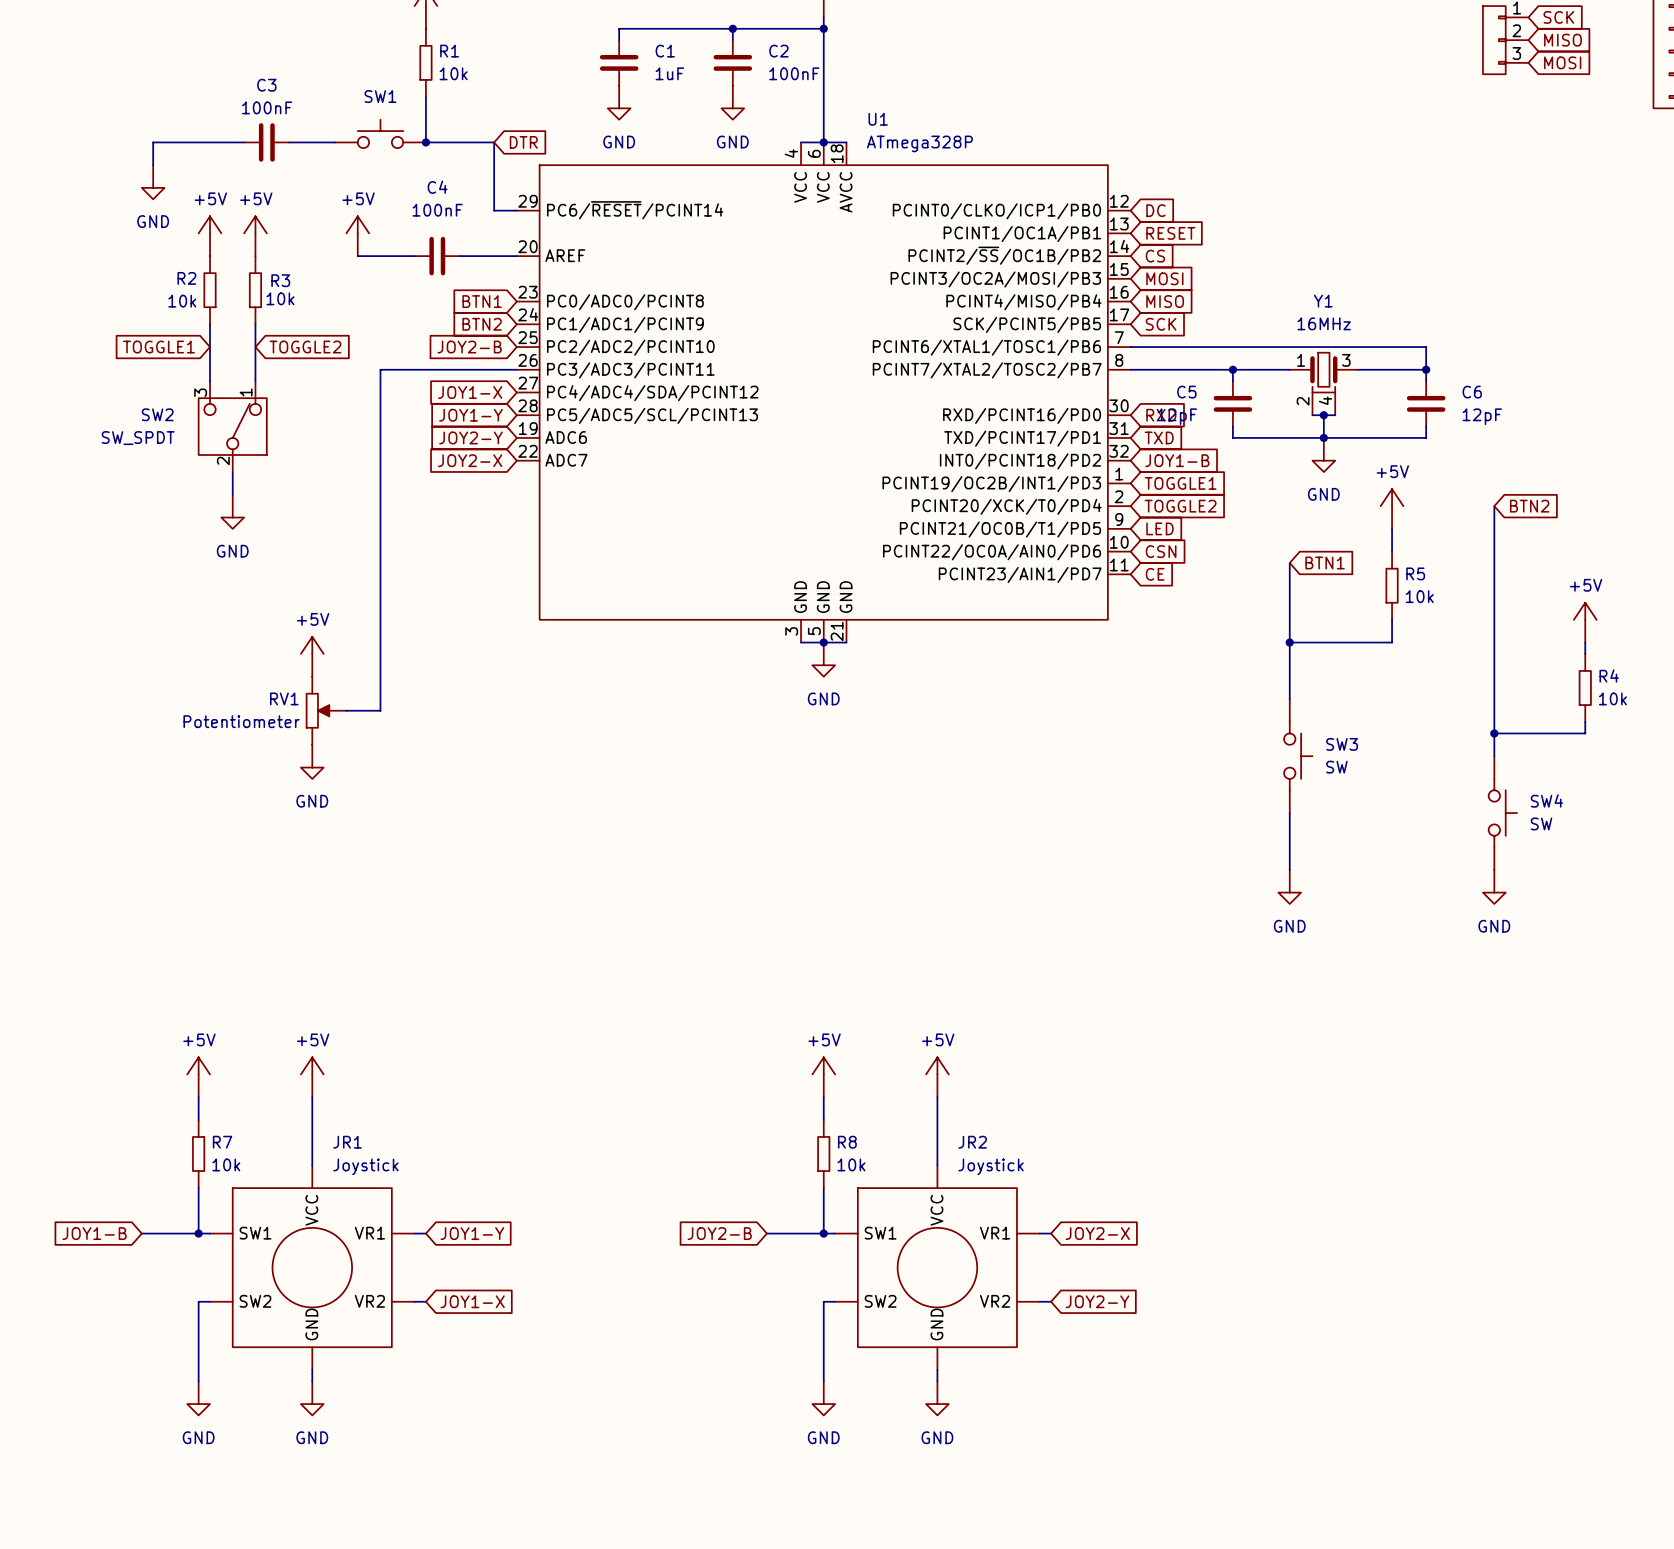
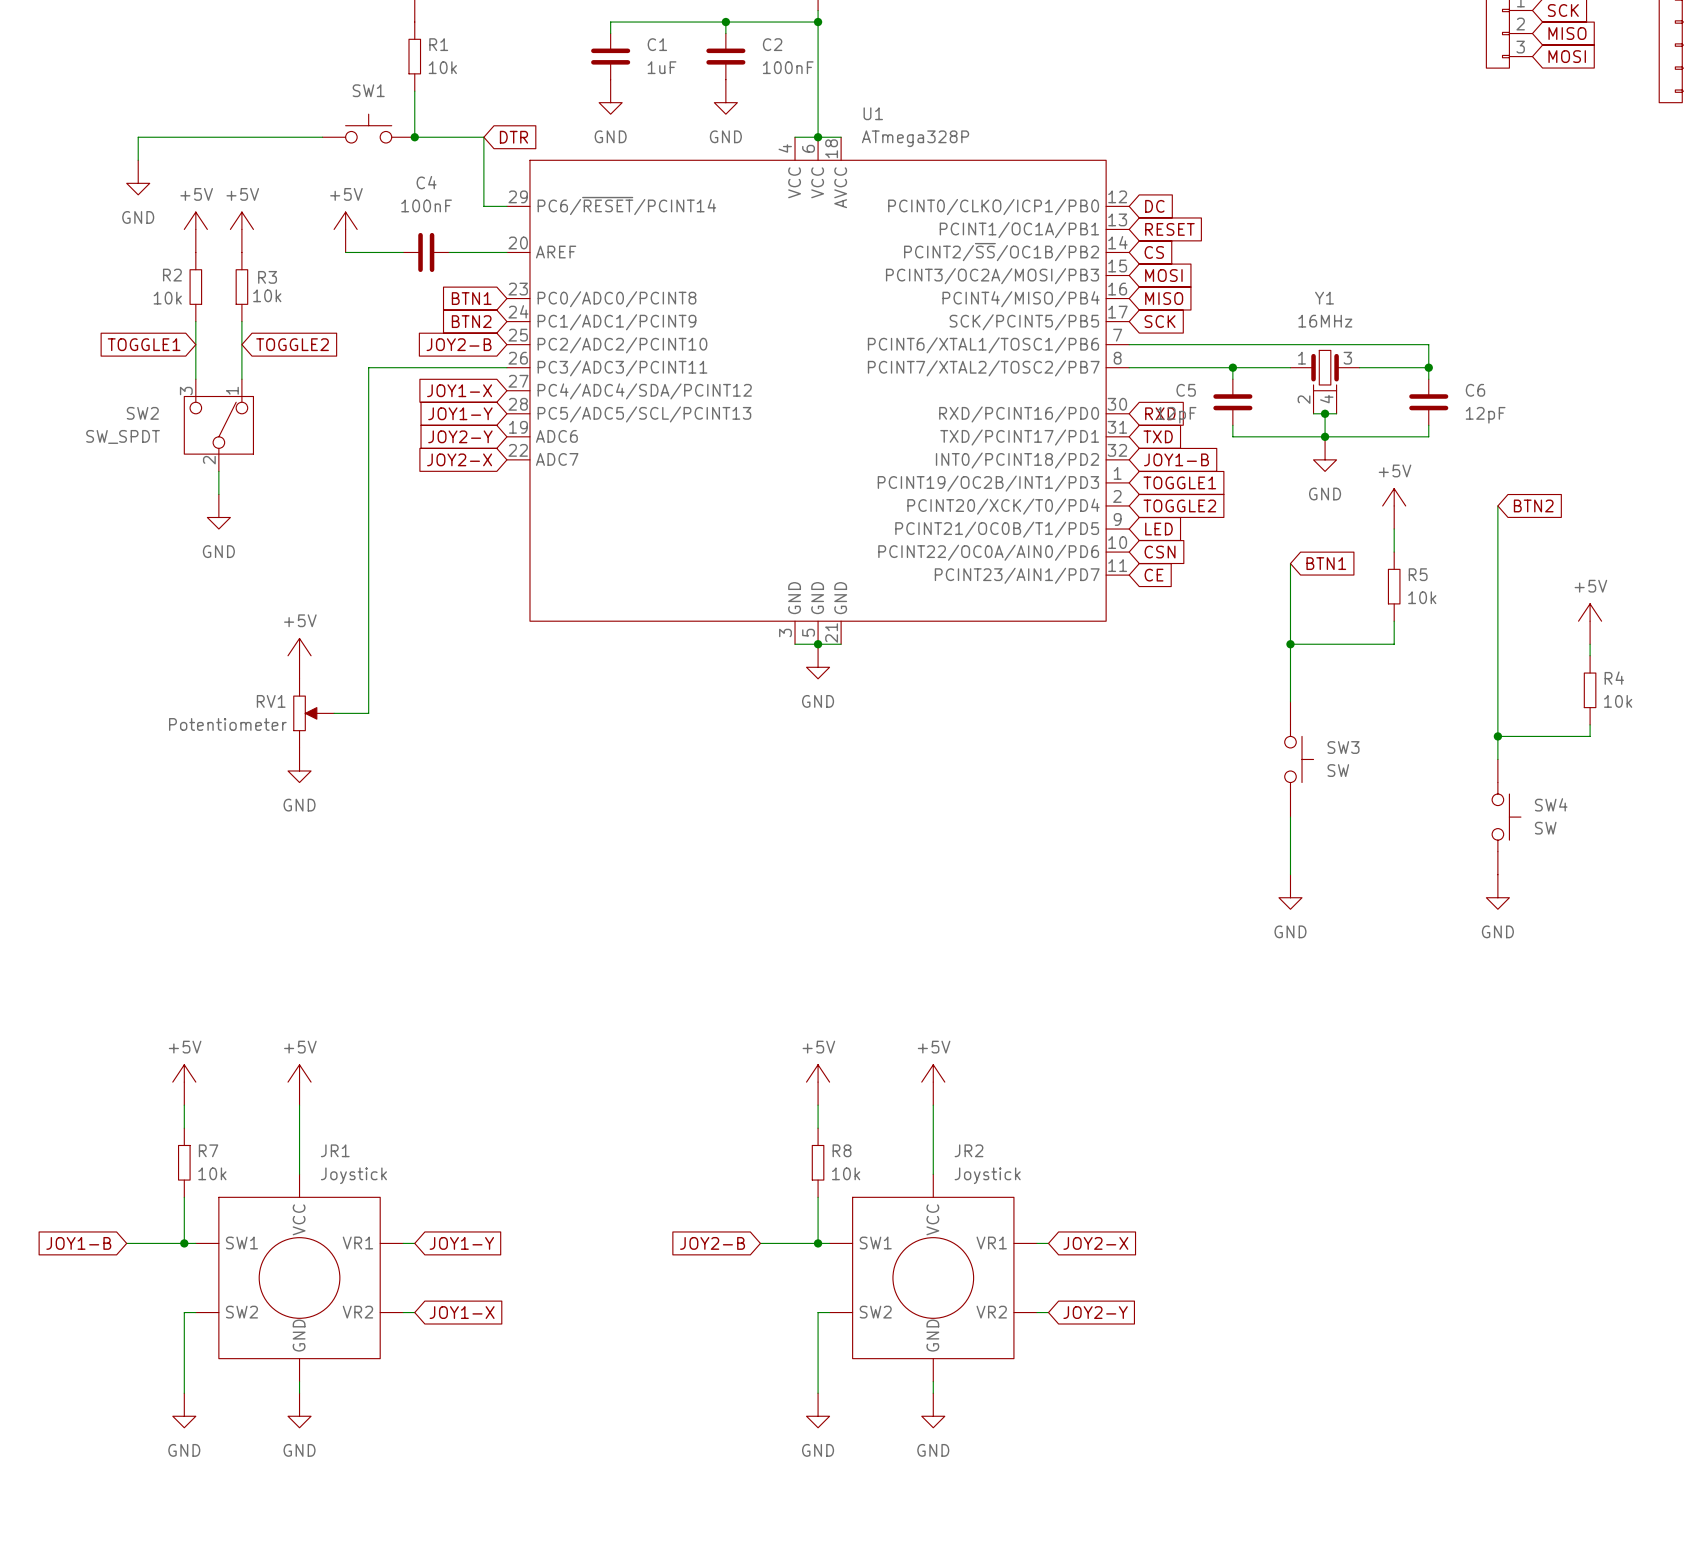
C3: 100nF (266, 142) -> none

